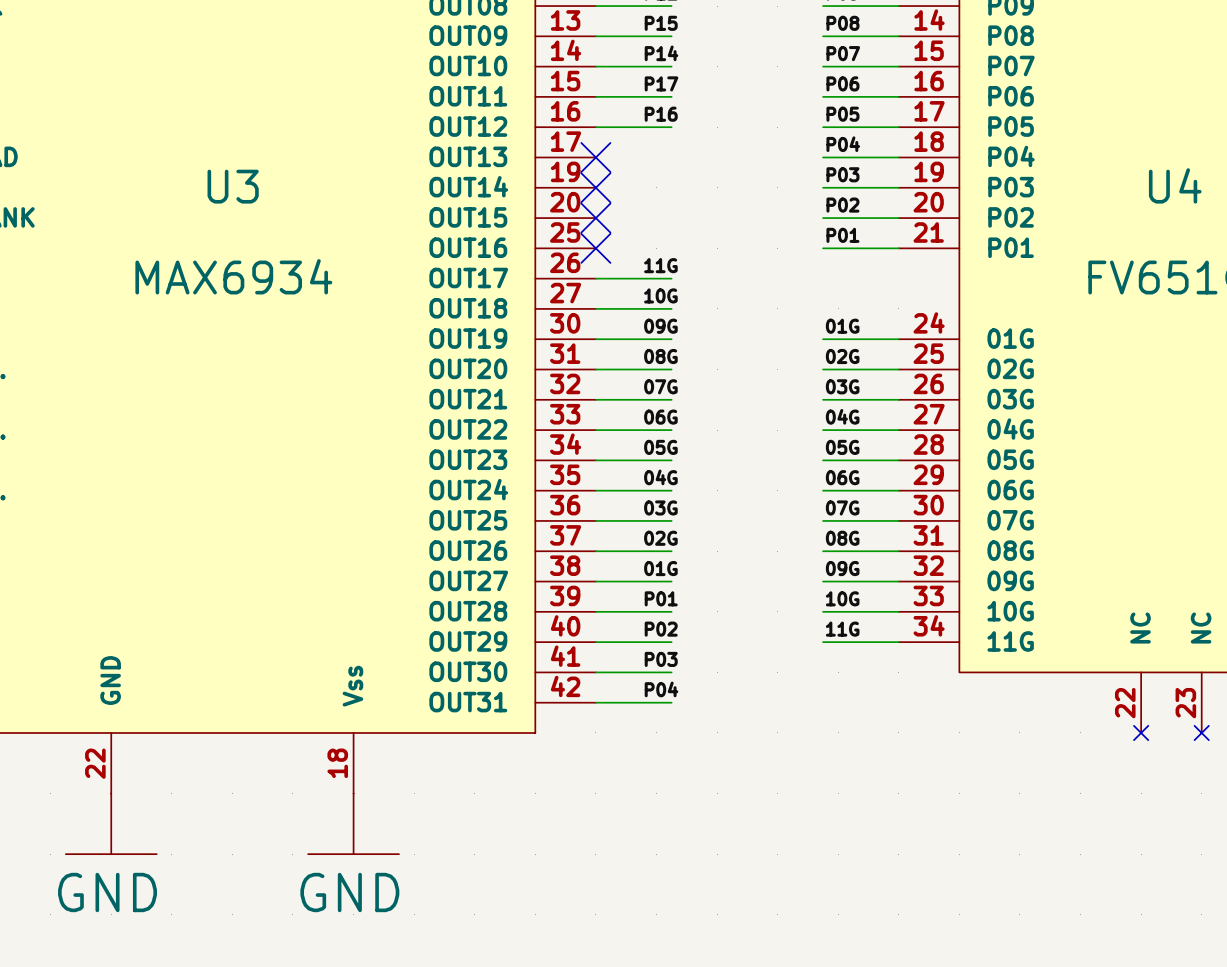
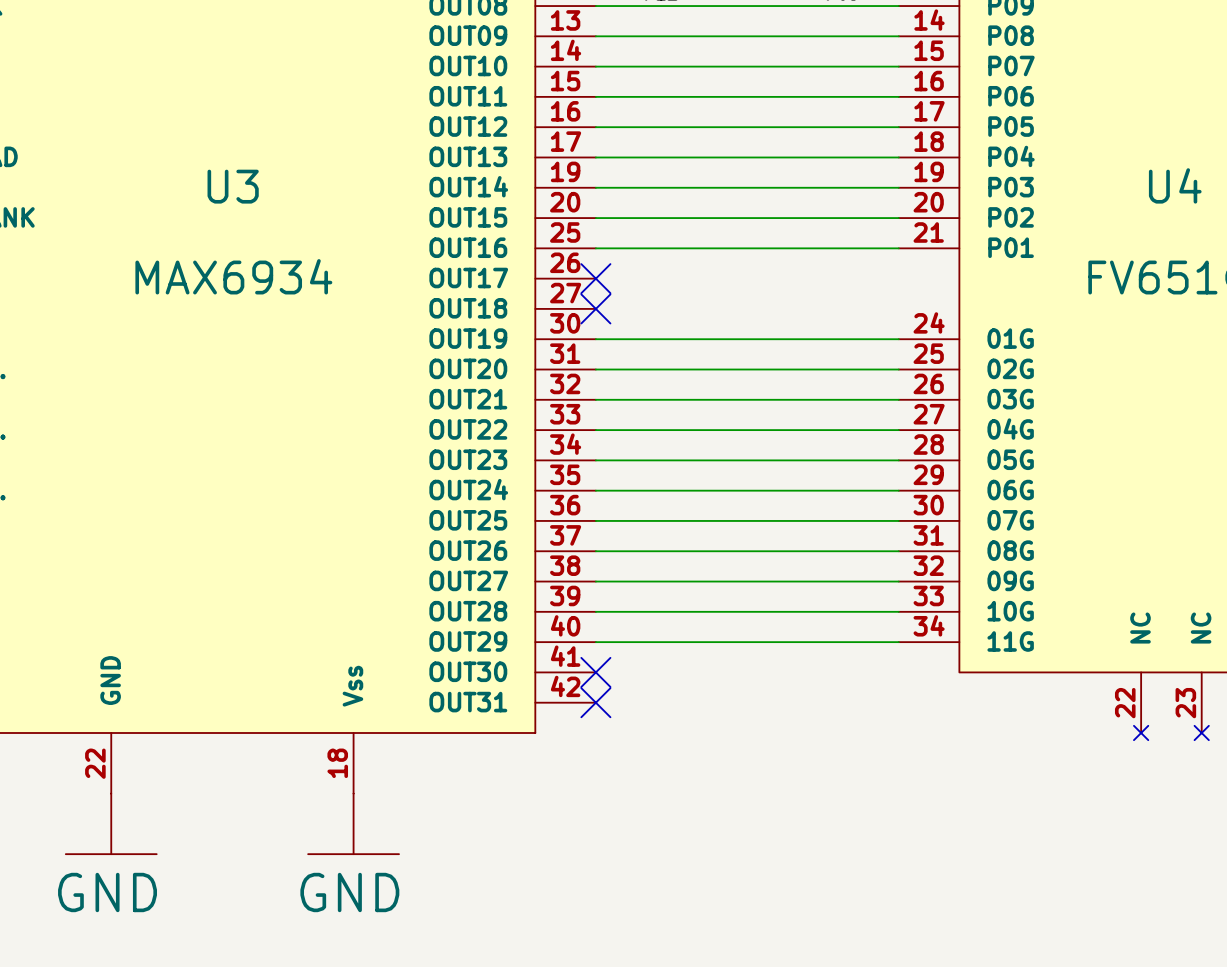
wire: none -> (671, 6) (823, 6)
label: P15 (661, 23) -> none
label: P08 (842, 23) -> none
wire: none -> (671, 36) (823, 36)
label: P14 (661, 53) -> none
label: P07 (843, 53) -> none
wire: none -> (671, 66) (823, 66)
label: P17 (661, 83) -> none
label: P06 (842, 83) -> none
wire: none -> (671, 96) (823, 96)
label: P16 (661, 114) -> none
label: P05 (842, 114) -> none
wire: none -> (671, 127) (823, 127)
label: P04 (843, 144) -> none
wire: none -> (595, 157) (823, 157)
no-connect mark: (595, 157) -> none
label: P03 (842, 174) -> none
wire: none -> (595, 187) (823, 187)
no-connect mark: (595, 187) -> none
label: P02 (842, 205) -> none
wire: none -> (595, 218) (823, 218)
no-connect mark: (595, 218) -> none
label: P01 (842, 235) -> none
wire: none -> (595, 248) (823, 248)
no-connect mark: (595, 248) -> none
label: 11G (660, 265) -> none
wire: (595, 278) (671, 278) -> none
no-connect mark: none -> (595, 278)
label: 10G (660, 295) -> none
wire: (595, 308) (671, 308) -> none
no-connect mark: none -> (595, 308)
label: 09G (660, 326) -> none
label: 01G (842, 326) -> none
wire: none -> (671, 339) (823, 339)
label: 08G (660, 356) -> none
label: 02G (842, 356) -> none
wire: none -> (671, 369) (823, 369)
label: 07G (660, 386) -> none
label: 03G (842, 386) -> none
wire: none -> (671, 399) (823, 399)
label: 04G (842, 416) -> none
label: 06G (660, 417) -> none
wire: none -> (671, 430) (823, 430)
label: 05G (660, 447) -> none
label: 05G (842, 447) -> none
wire: none -> (671, 460) (823, 460)
label: 04G (660, 477) -> none
label: 06G (842, 477) -> none
wire: none -> (671, 490) (823, 490)
label: 03G (660, 507) -> none
label: 07G (842, 507) -> none
wire: none -> (671, 520) (823, 520)
label: 02G (660, 538) -> none
label: 08G (842, 538) -> none
wire: none -> (671, 551) (823, 551)
label: 01G (660, 568) -> none
label: 09G (842, 568) -> none
wire: none -> (671, 581) (823, 581)
label: P01 (661, 598) -> none
label: 10G (842, 598) -> none
wire: none -> (671, 611) (823, 611)
label: P02 (661, 629) -> none
label: 11G (842, 629) -> none
wire: none -> (671, 642) (823, 642)
label: P03 (661, 659) -> none
wire: (595, 672) (671, 672) -> none
no-connect mark: none -> (595, 672)
label: P04 (661, 689) -> none
wire: (595, 702) (671, 702) -> none
no-connect mark: none -> (595, 702)

